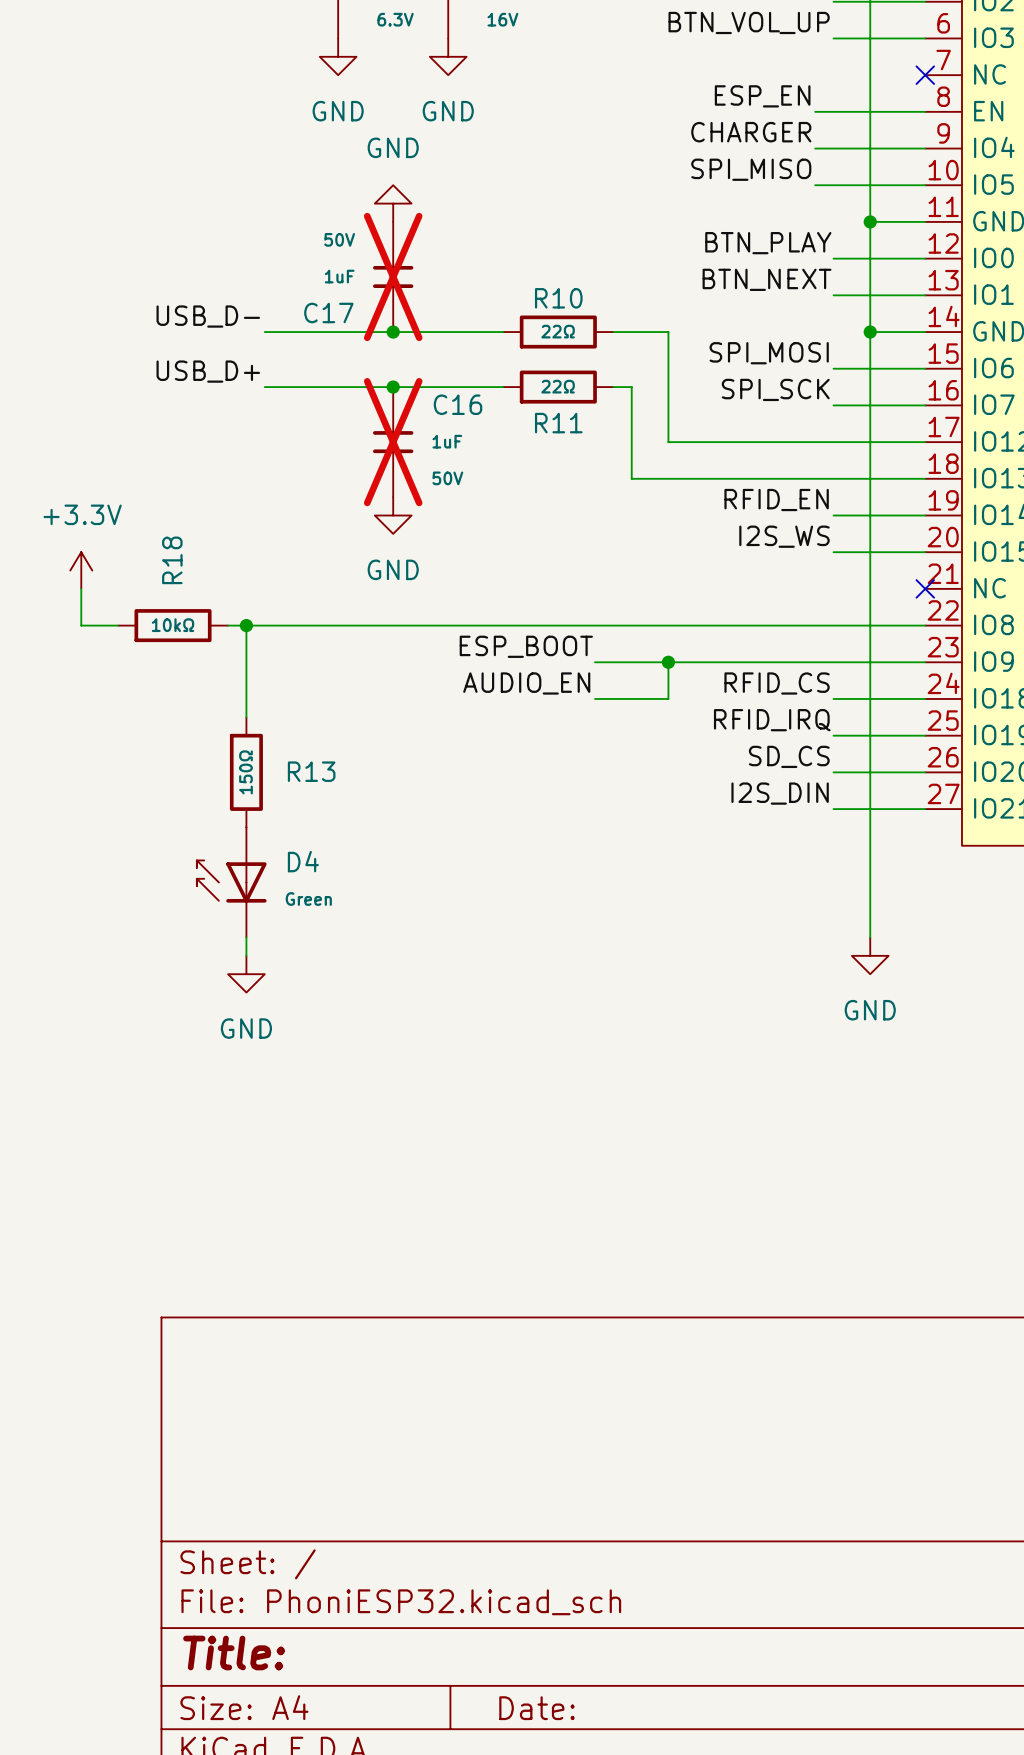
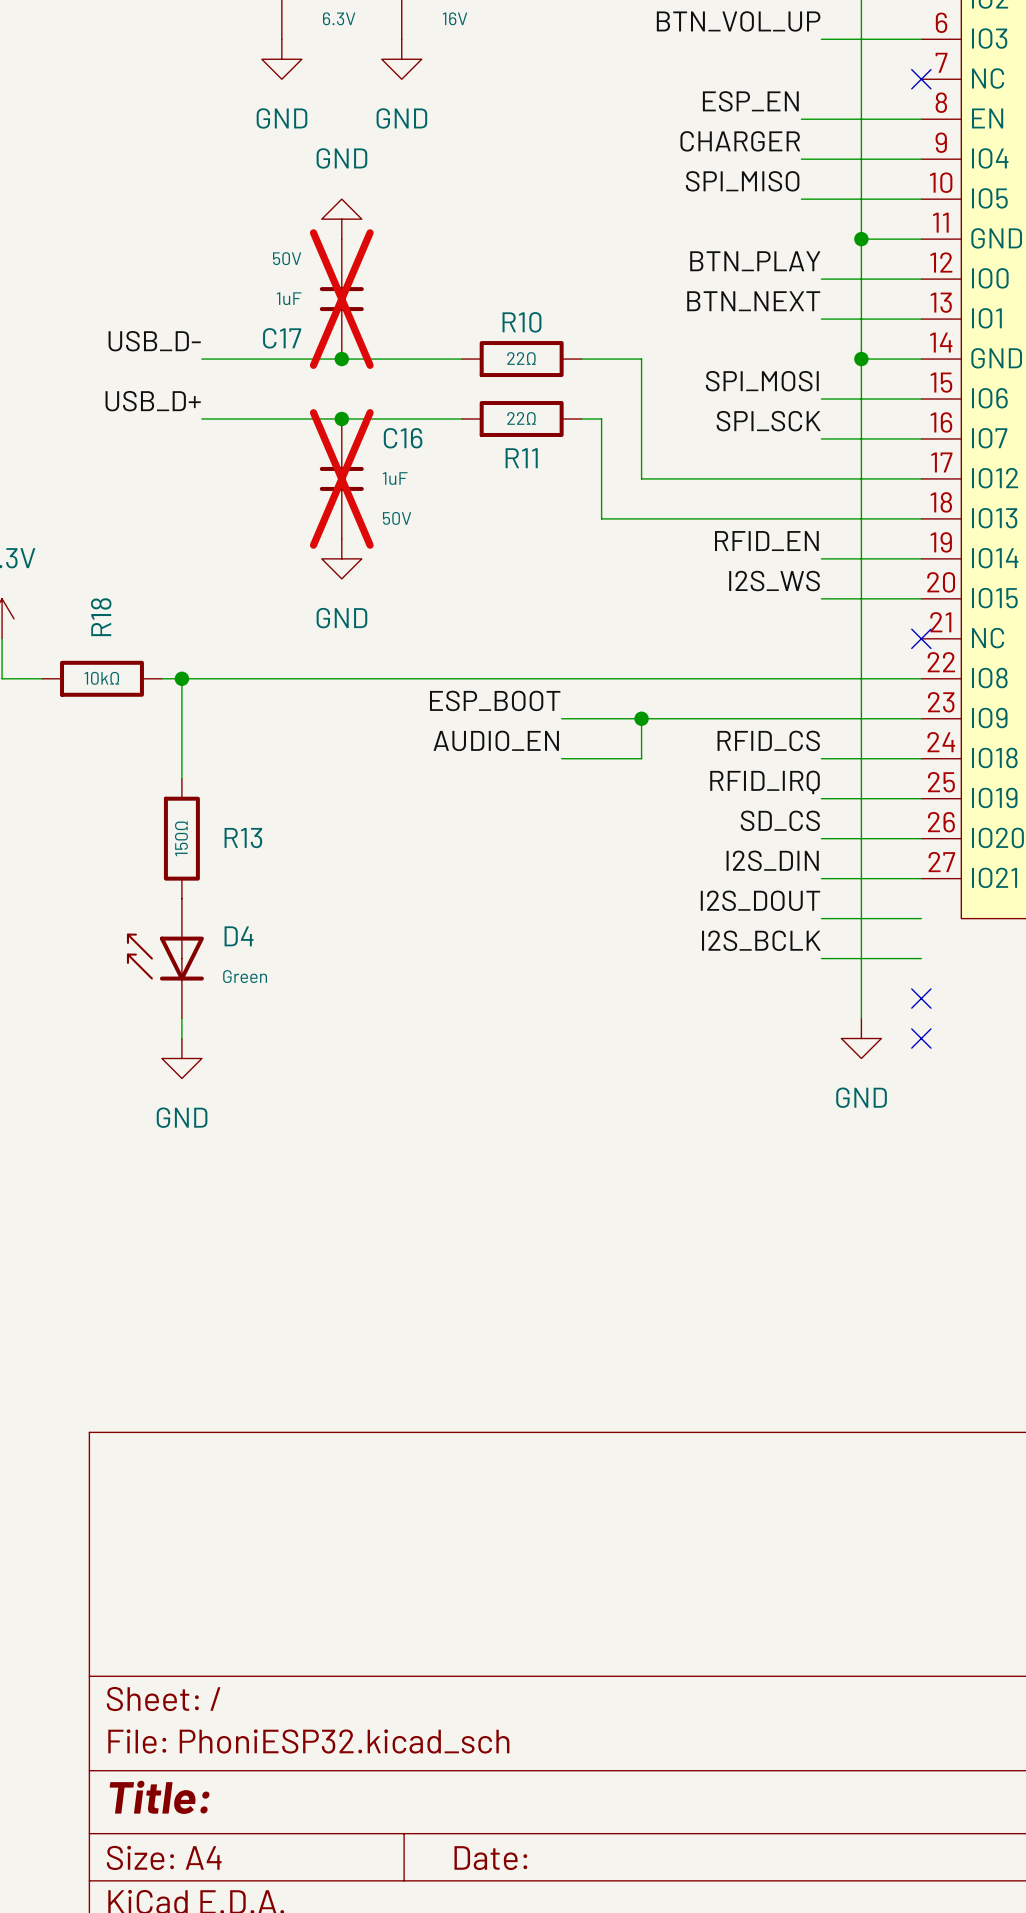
label: none -> I2S_DOUT (760, 900)
wire: none -> (821, 918) (921, 918)
label: none -> I2S_BCLK (761, 940)
wire: none -> (821, 958) (921, 958)
no-connect mark: none -> (921, 998)
no-connect mark: none -> (921, 1038)

